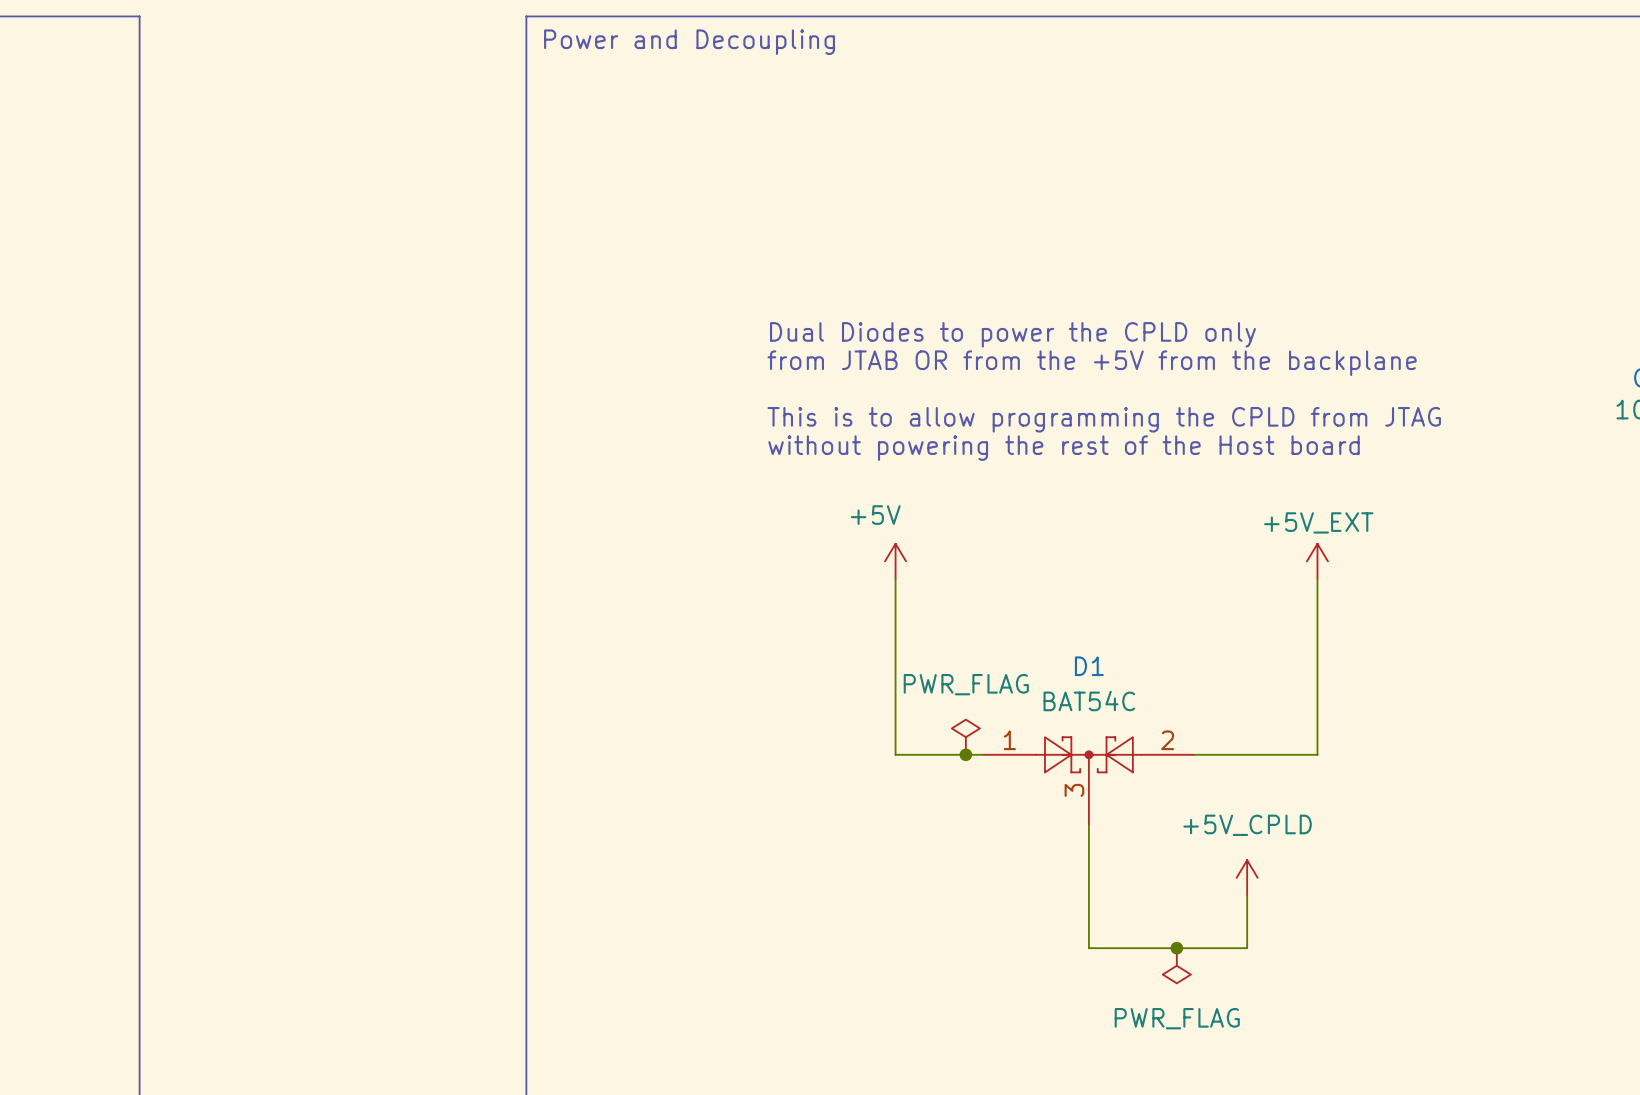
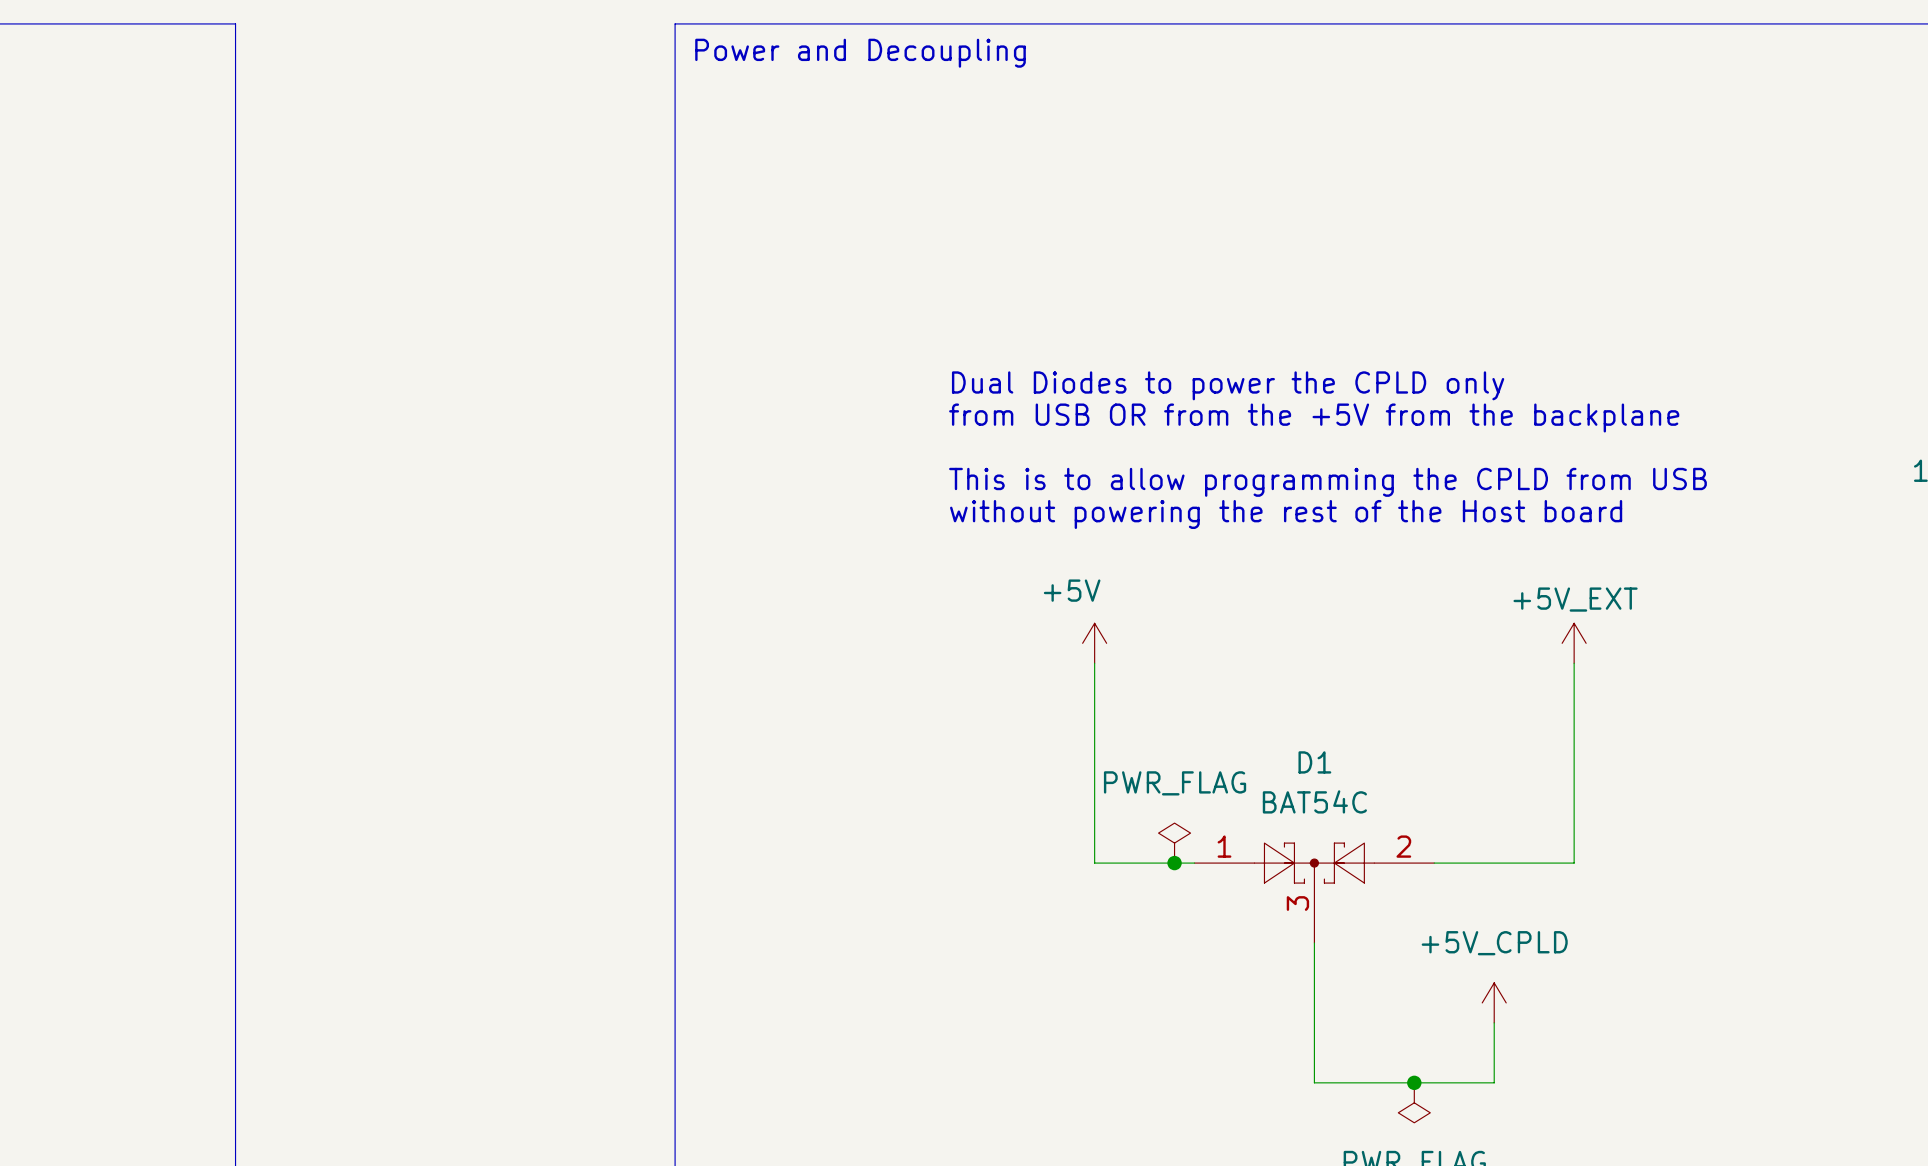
text: from JTAB OR from the +5V from the backplane (1092, 363) -> from USB OR from the +5V from the backplane (1314, 417)
text: This is to allow programming the CPLD from JTAG (1104, 419) -> This is to allow programming the CPLD from USB (1327, 482)

